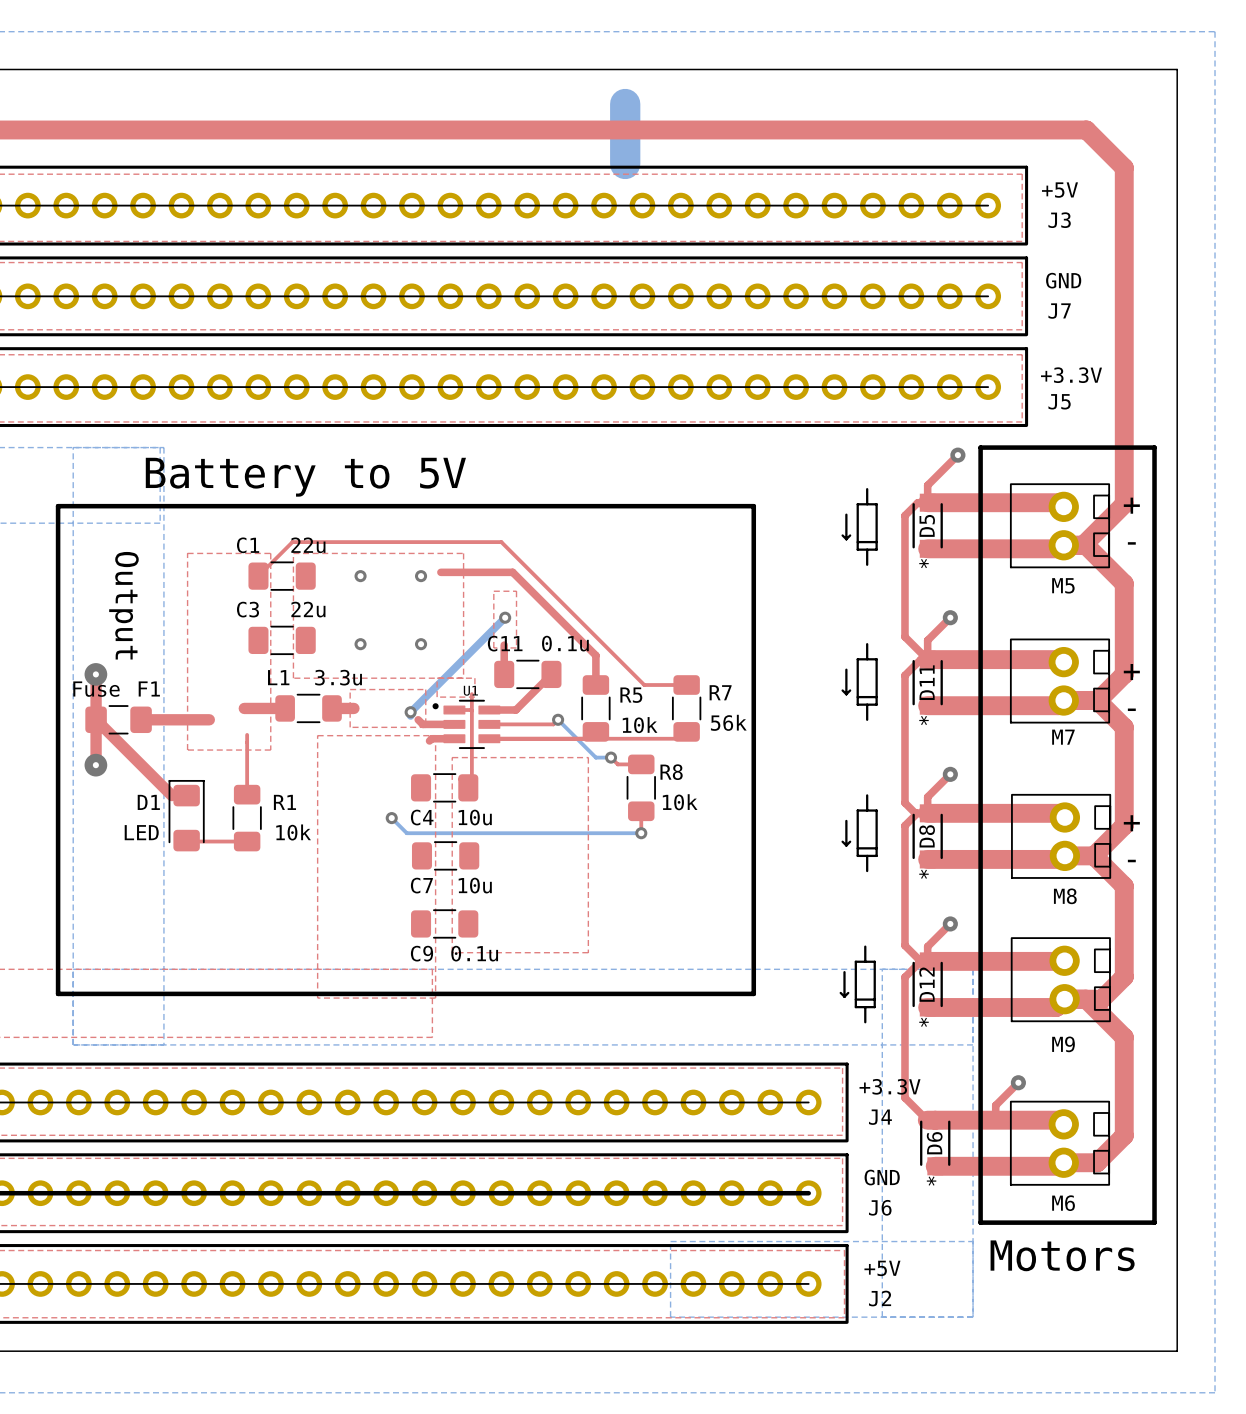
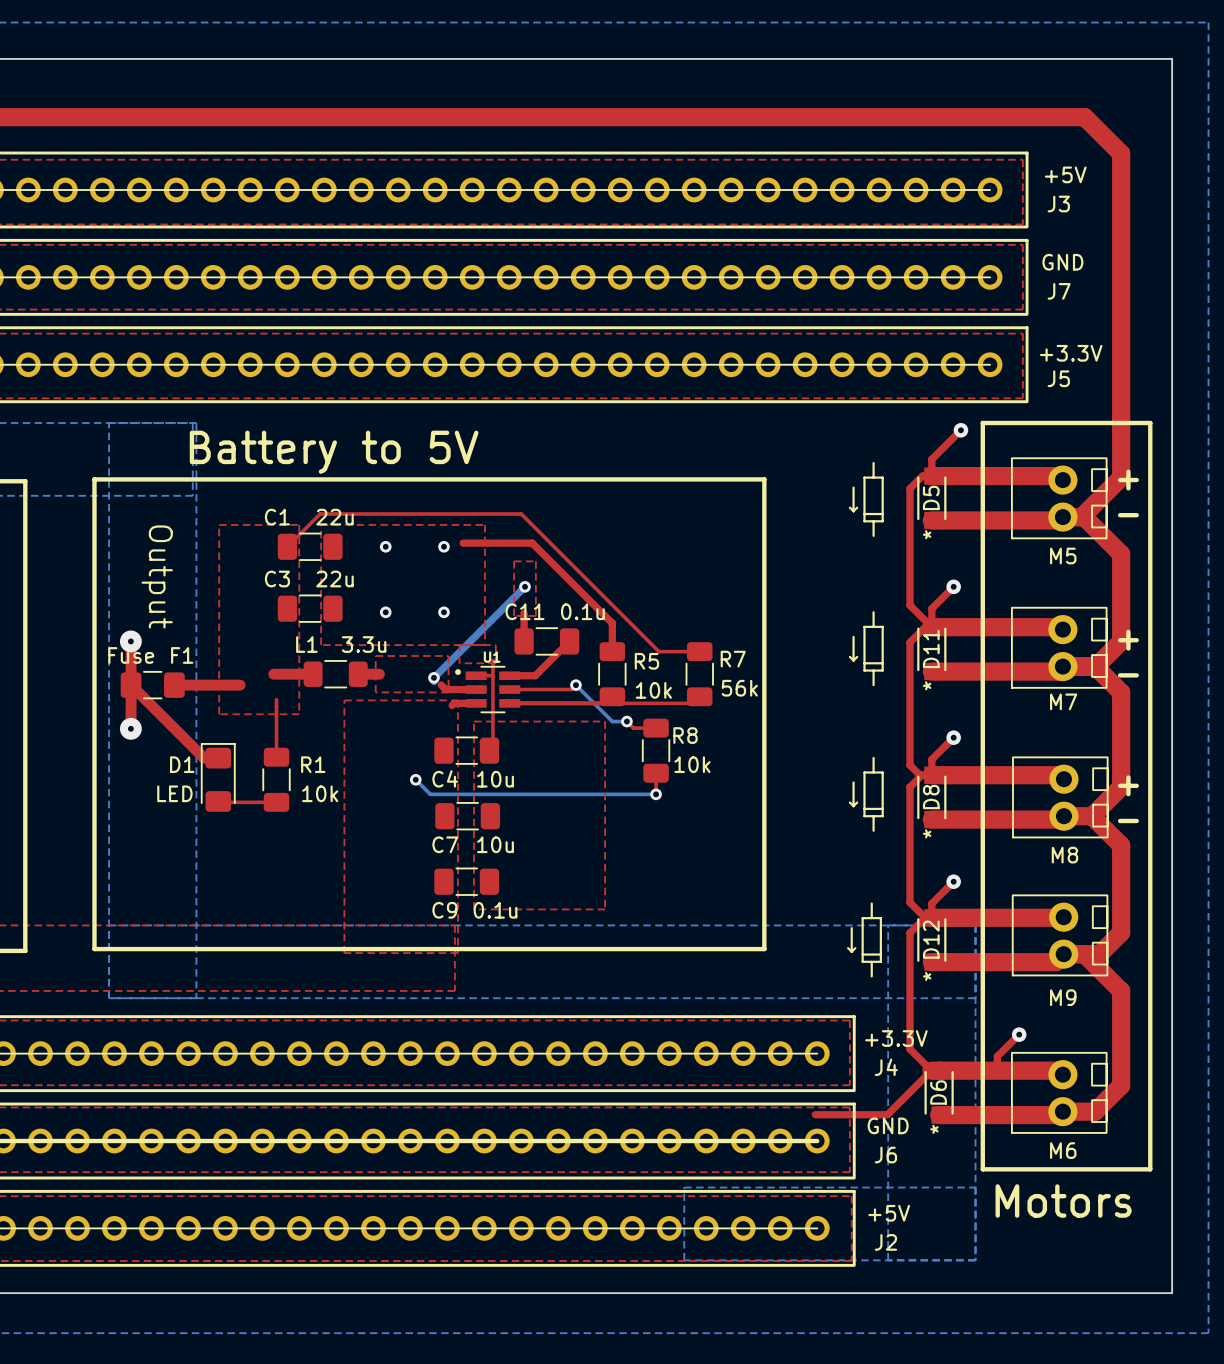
bottom track: (625, 103) (625, 164) -> none
top track: none -> (931, 1070) (887, 1114) (815, 1114)

